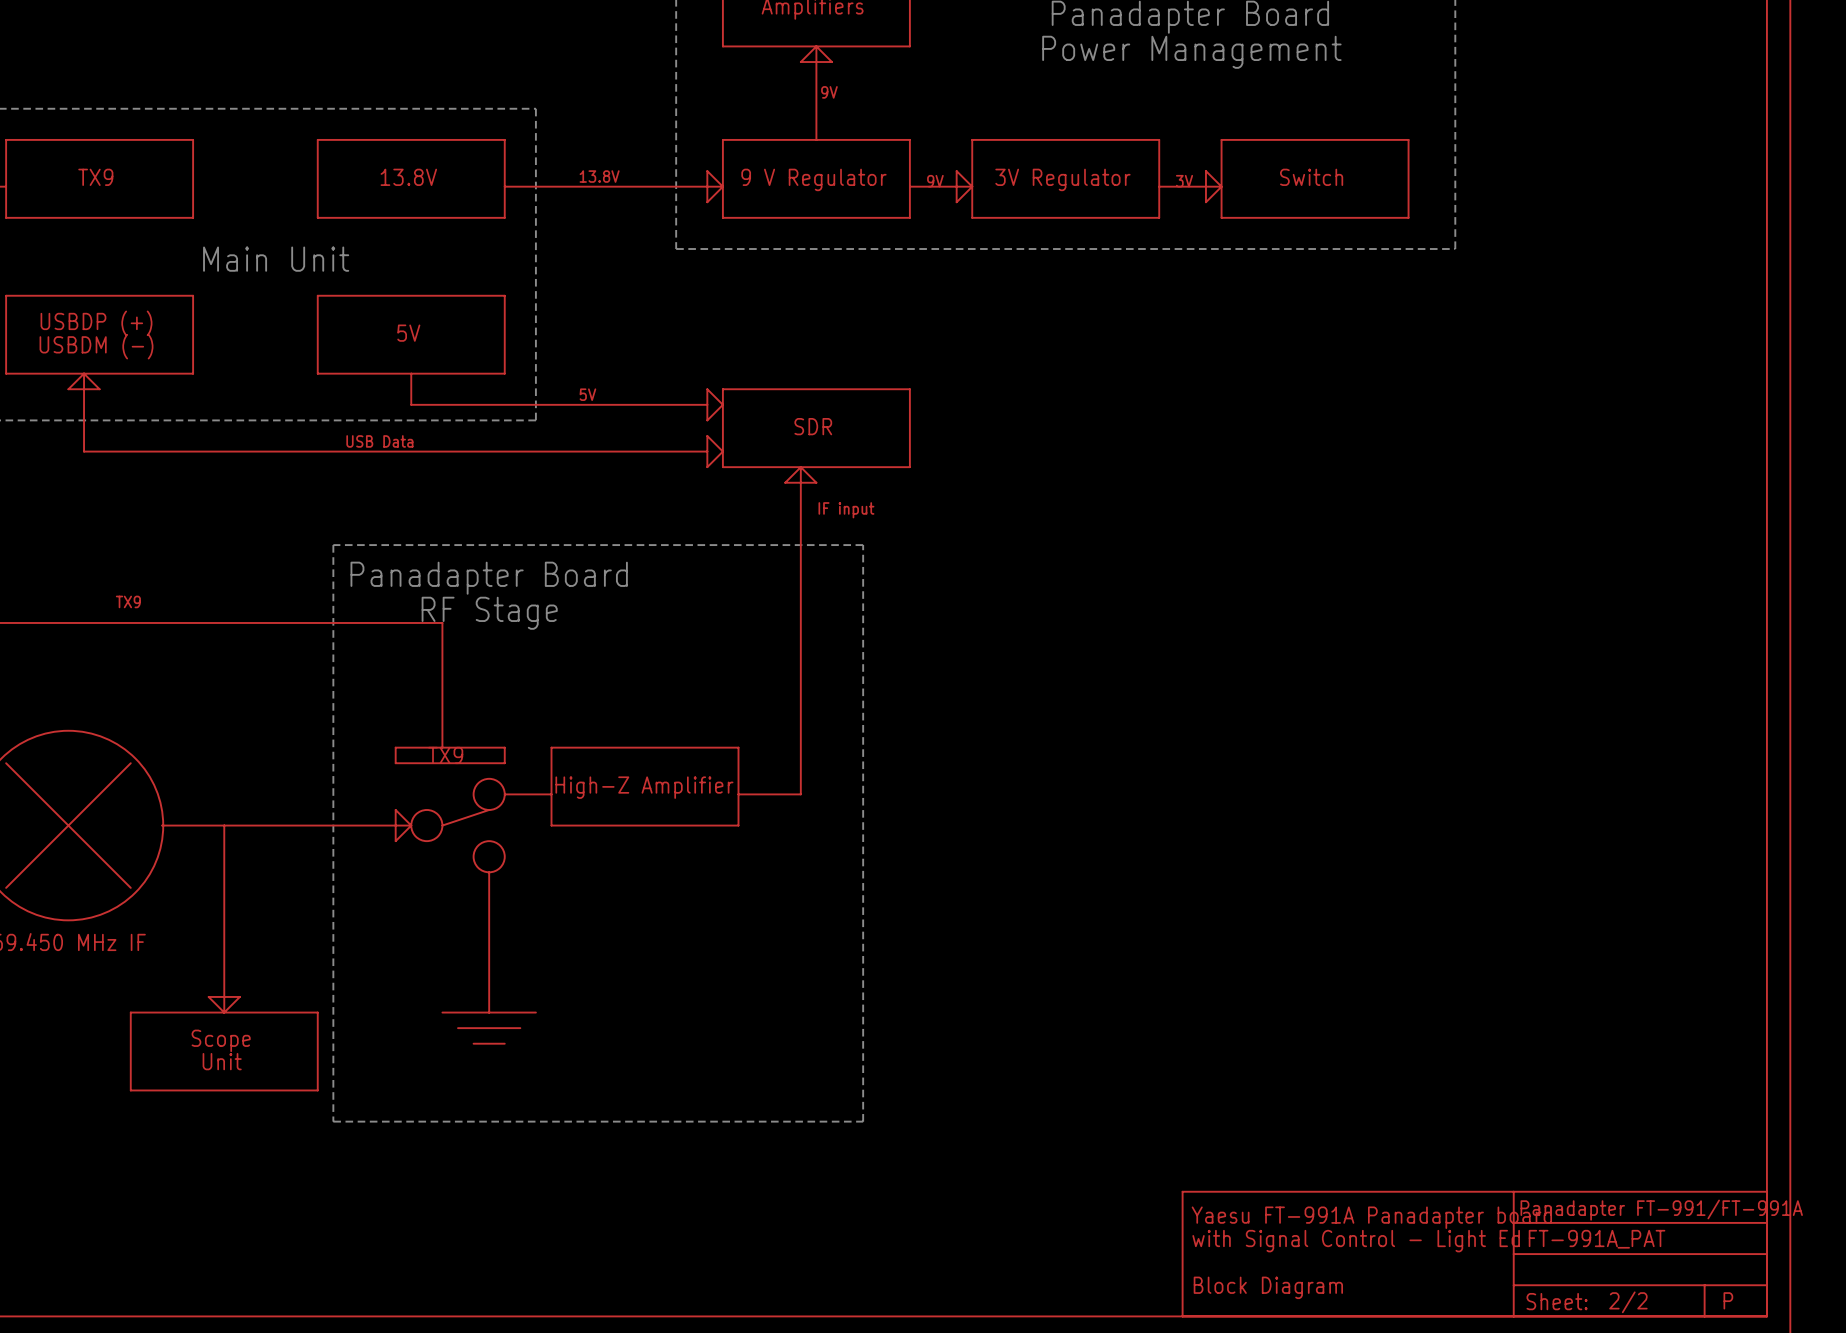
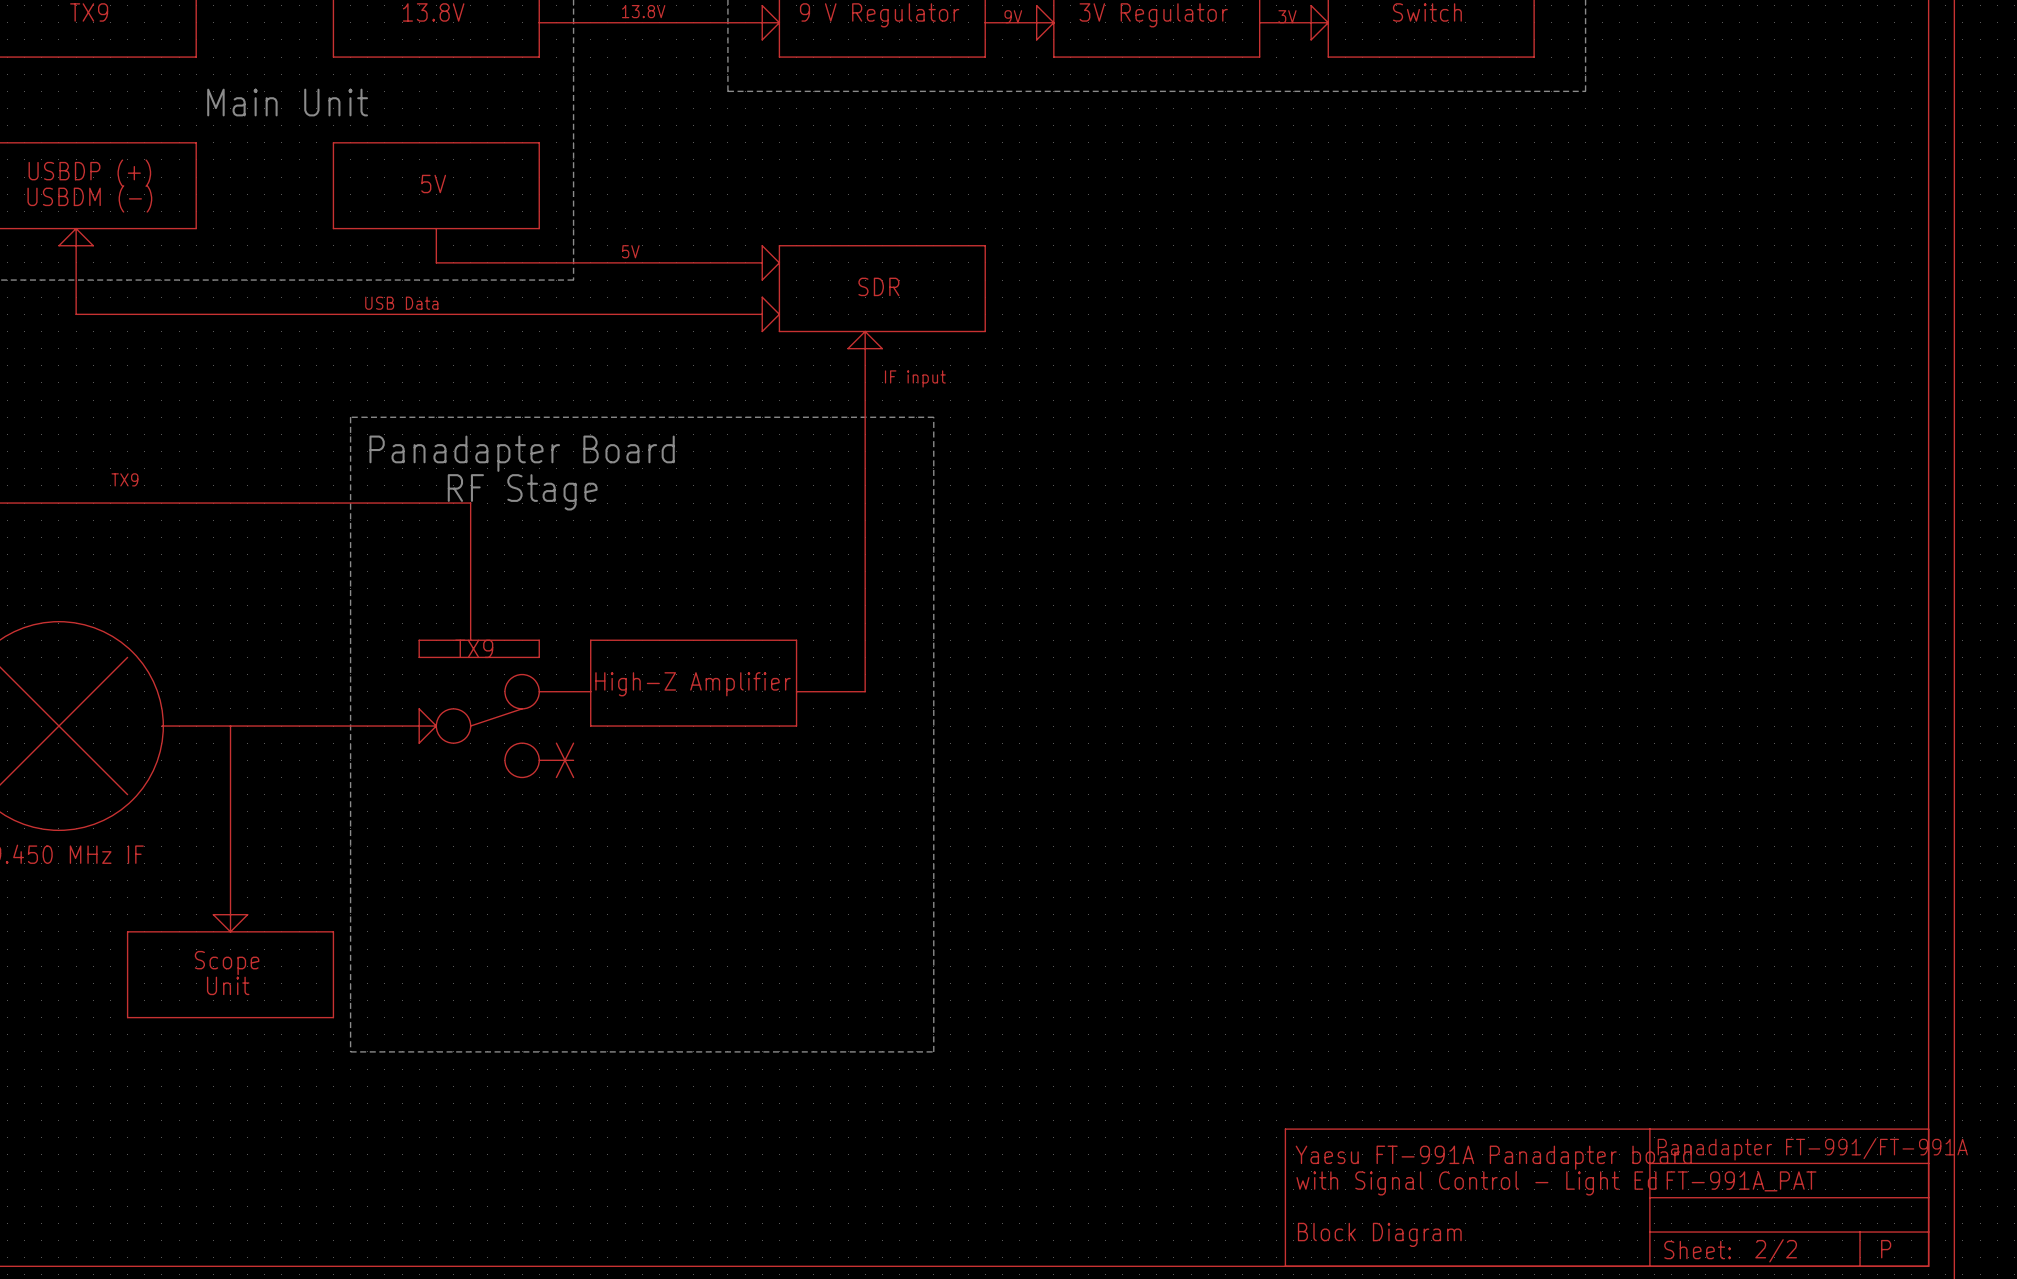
line: none -> (556, 743) (573, 777)
line: none -> (573, 743) (556, 777)
line: none -> (539, 760) (573, 760)
line: (489, 872) (489, 1012) -> none
line: (442, 1012) (535, 1012) -> none
line: (458, 1028) (520, 1028) -> none
line: (473, 1043) (504, 1043) -> none

